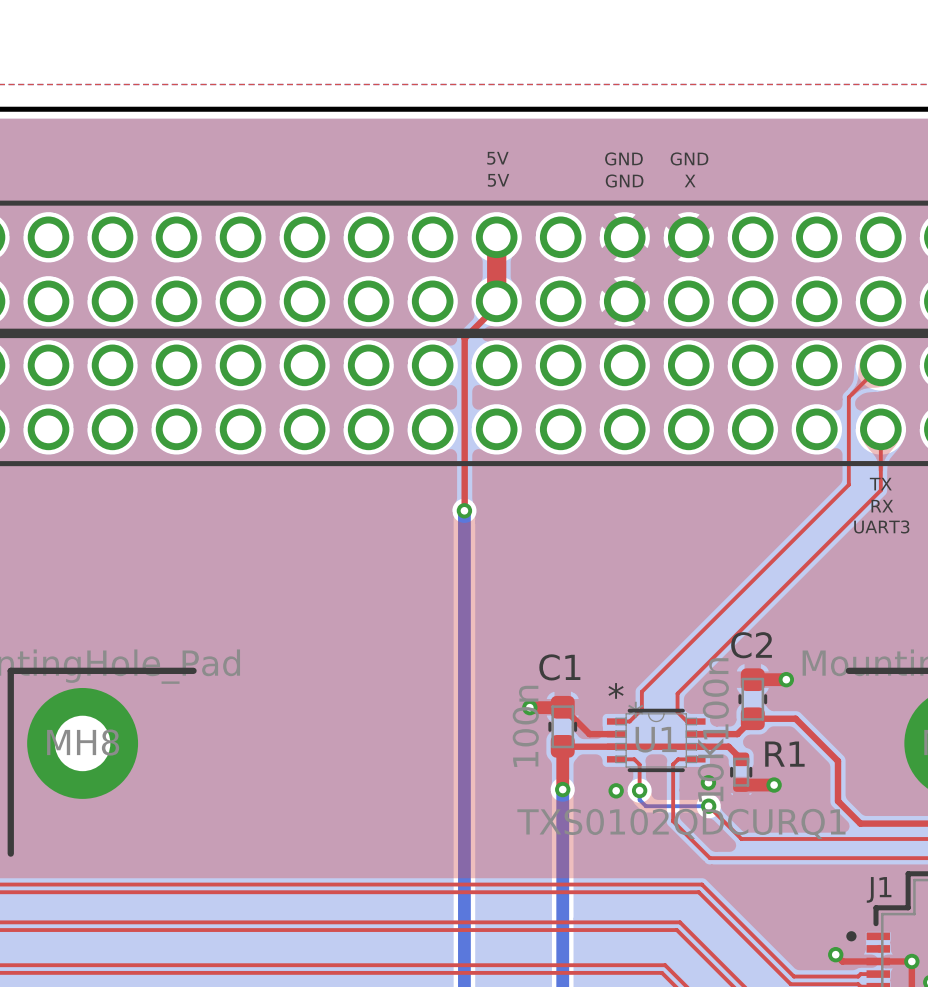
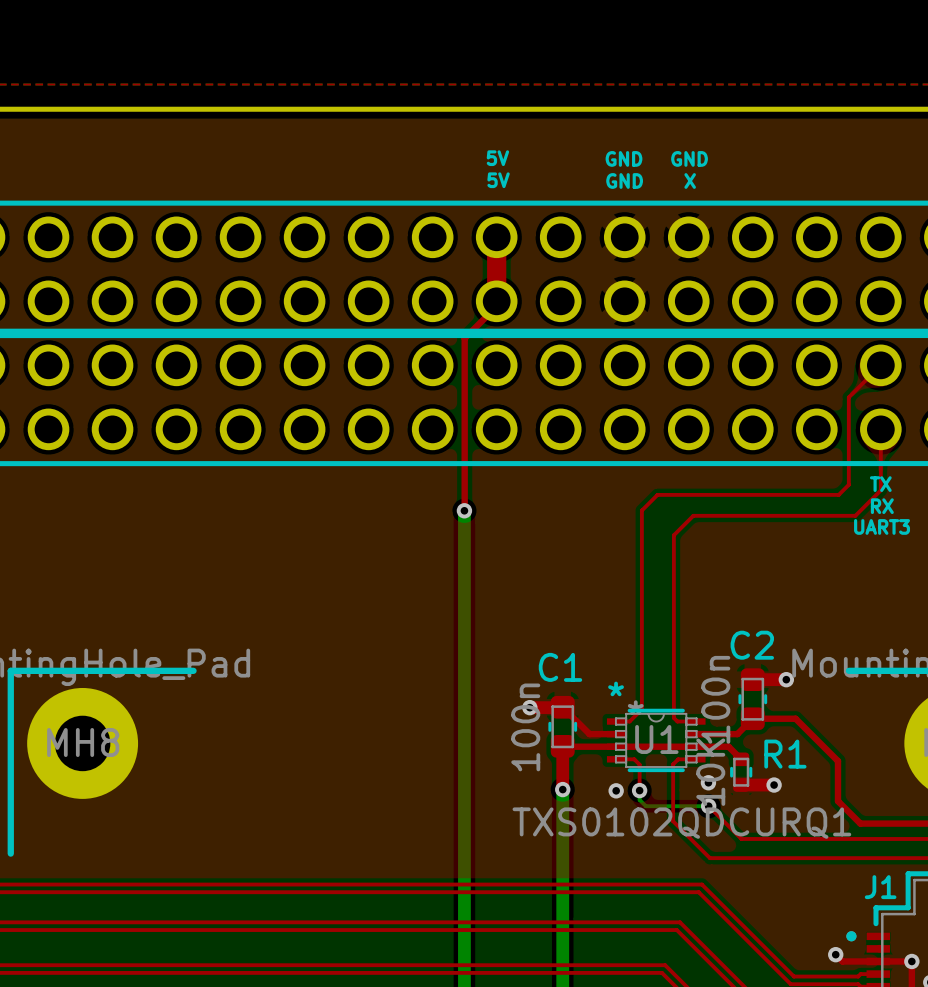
top track: (838, 494) (641, 691) -> (838, 494) (657, 494) (641, 510) (641, 691)
top track: (855, 515) (677, 693) (677, 712) (687, 721) -> (855, 515) (693, 515) (673, 535) (673, 717) (677, 721) (687, 721)

